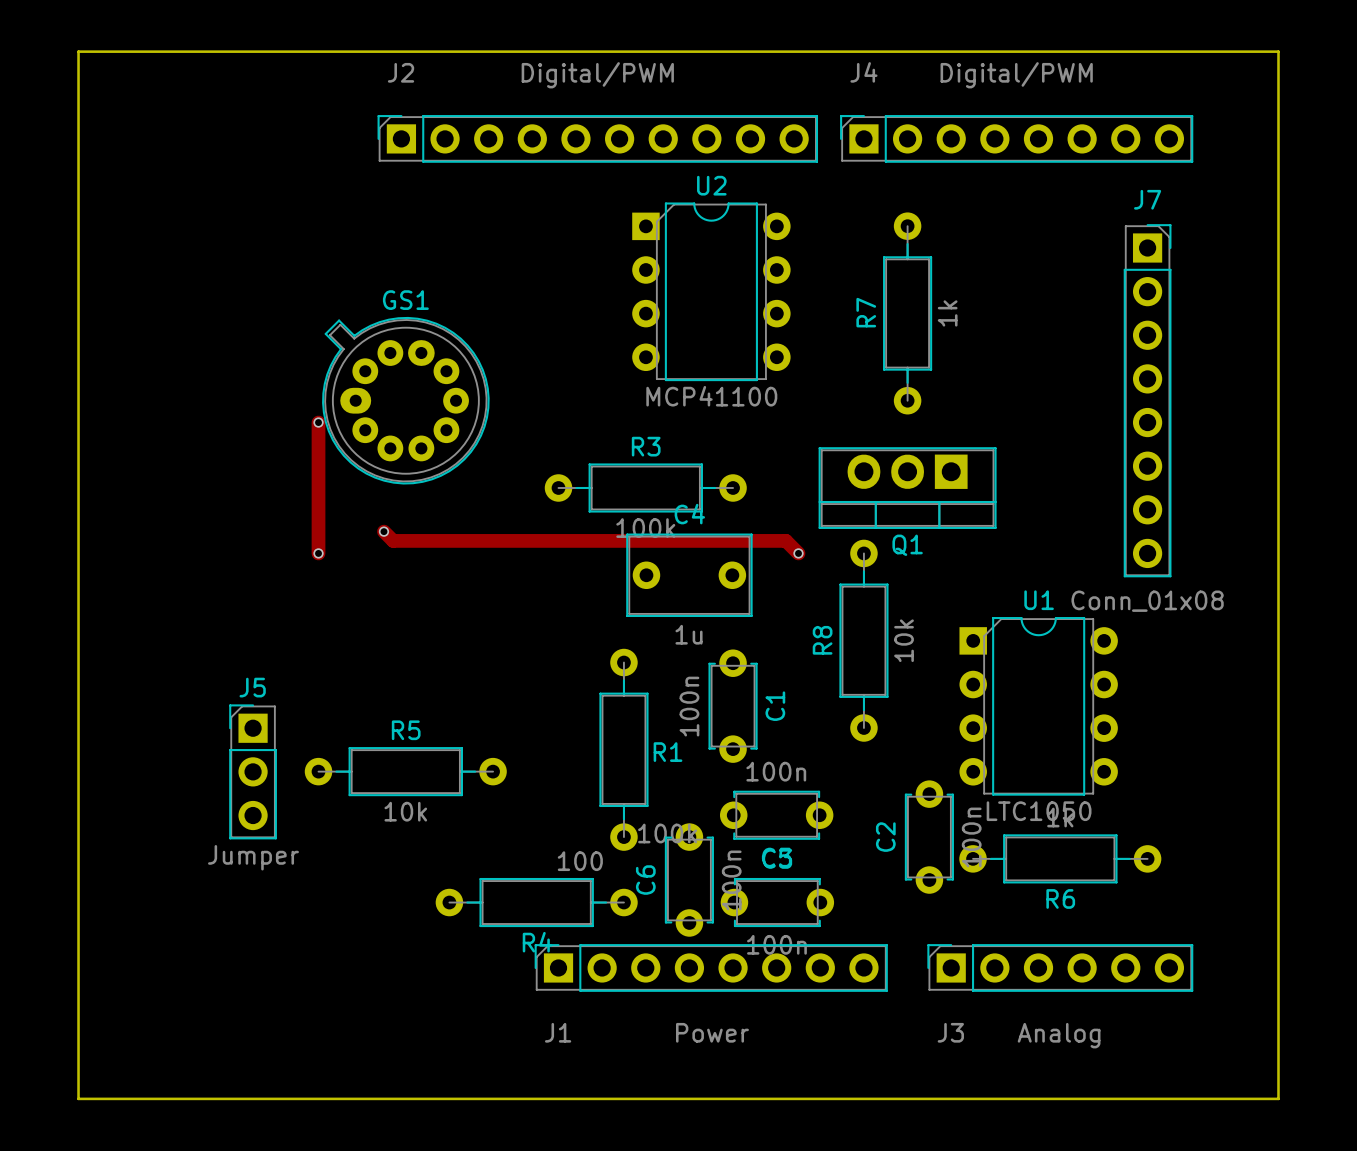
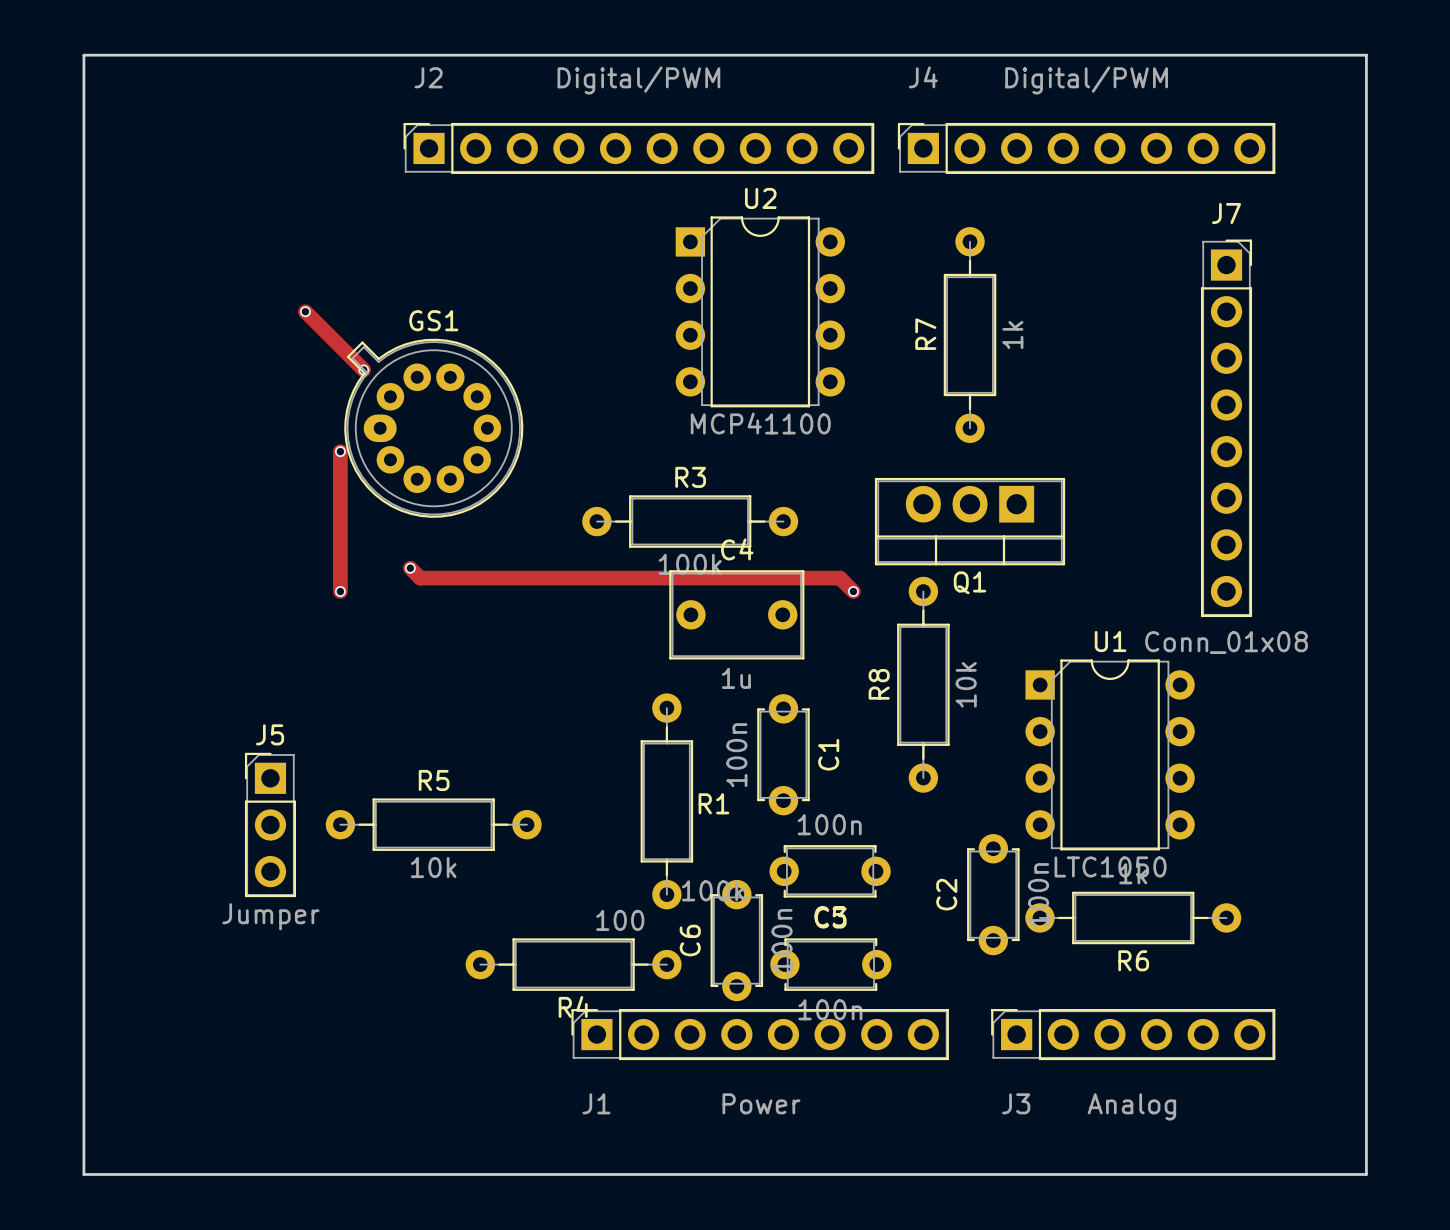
track: none -> (305, 311) (363, 369)
via: none -> (305, 311)
via: none -> (363, 369)

